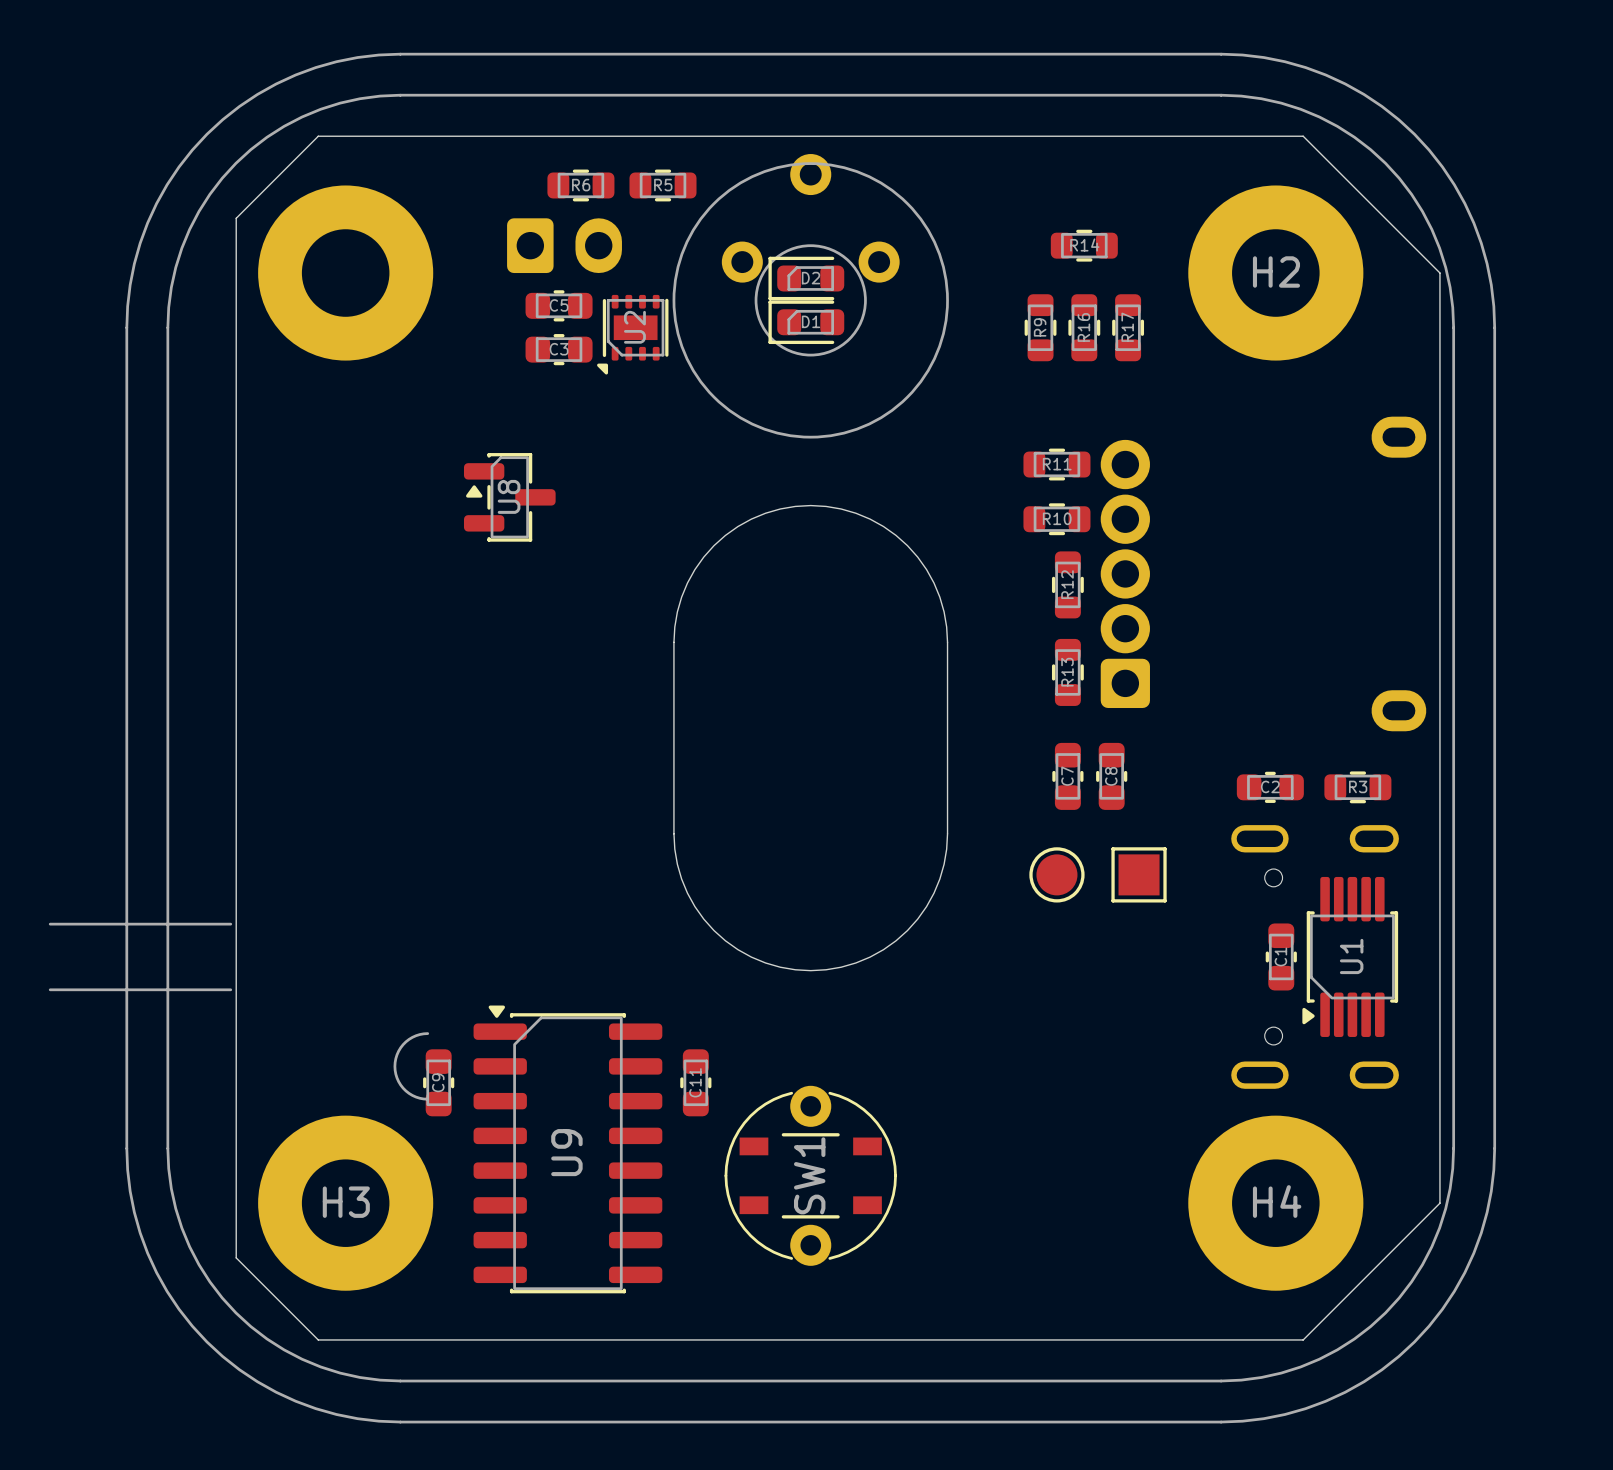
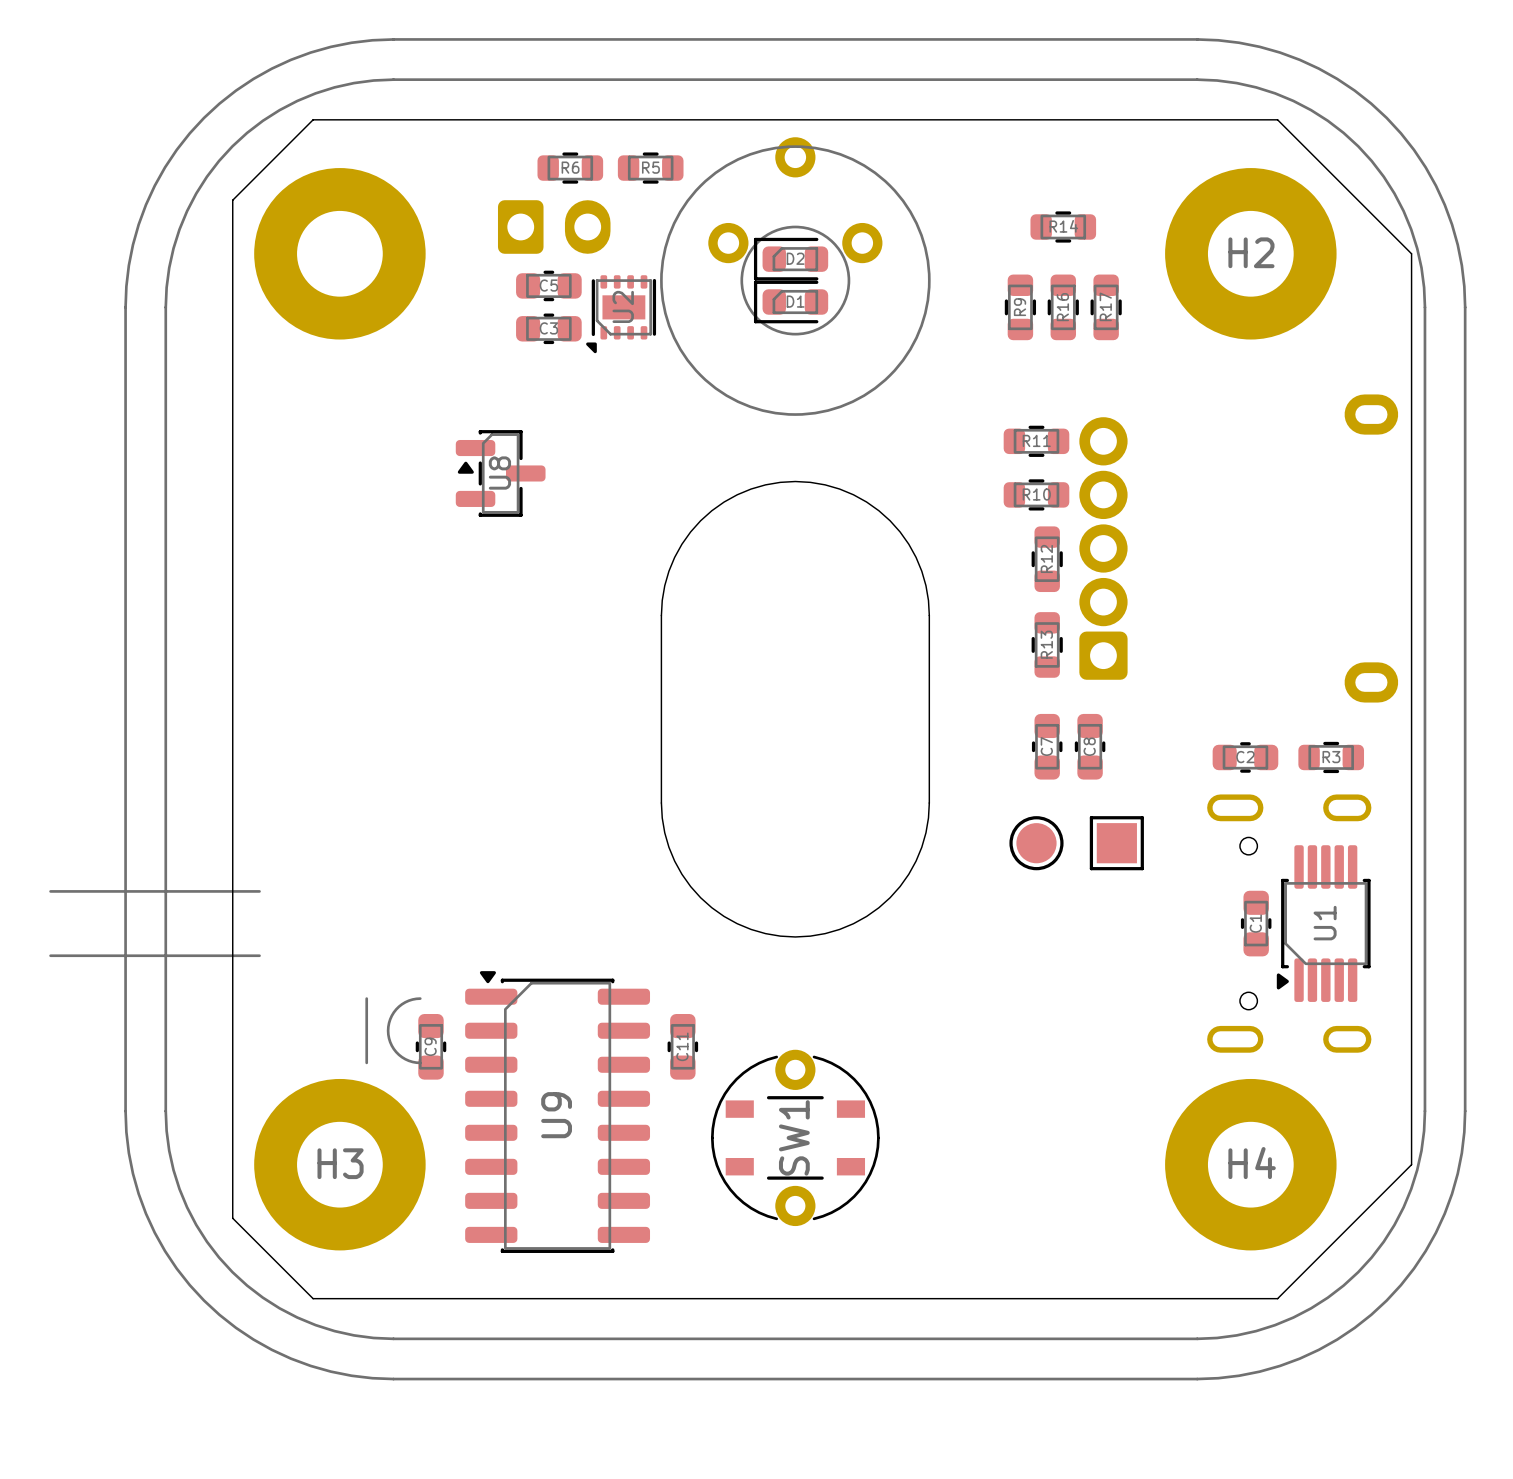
line: none -> (227, 891) (259, 891)
line: none -> (227, 955) (259, 955)
line: none -> (366, 998) (366, 1062)

